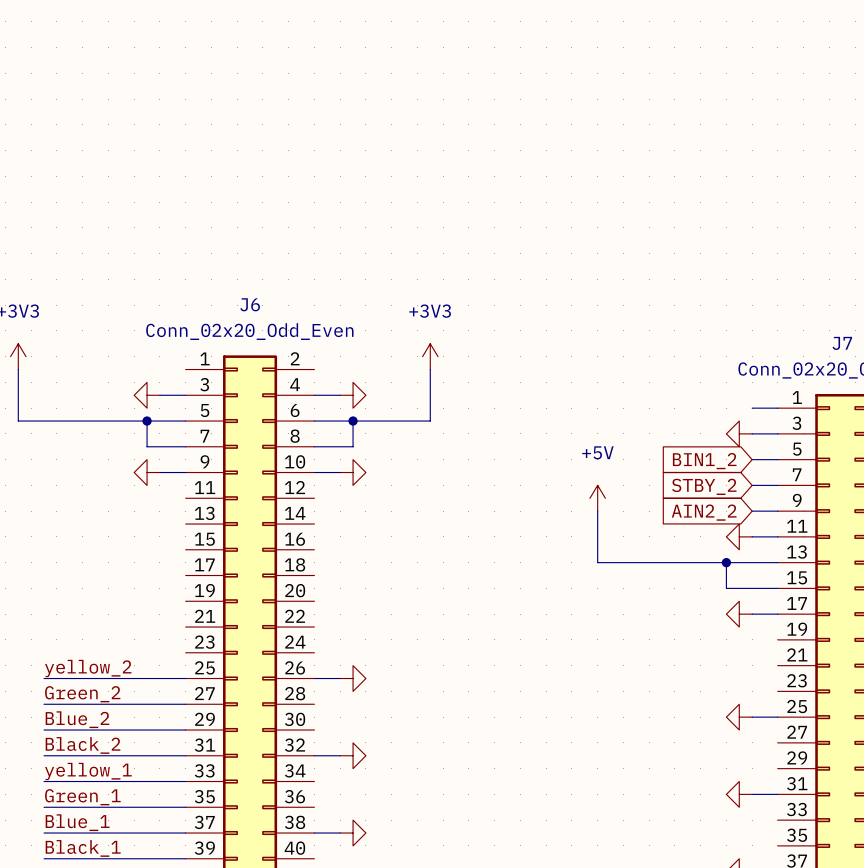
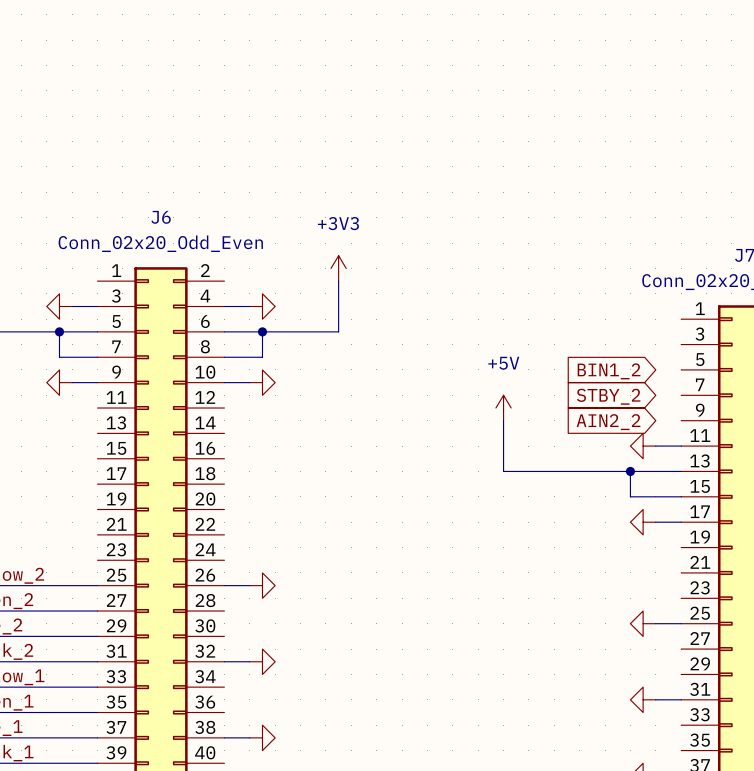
wire: (752, 408) (777, 408) -> none
power symbol: (739, 433) -> none
wire: (752, 433) (777, 433) -> none
wire: (752, 459) (777, 459) -> none
wire: (752, 485) (777, 485) -> none
wire: (752, 511) (777, 511) -> none

